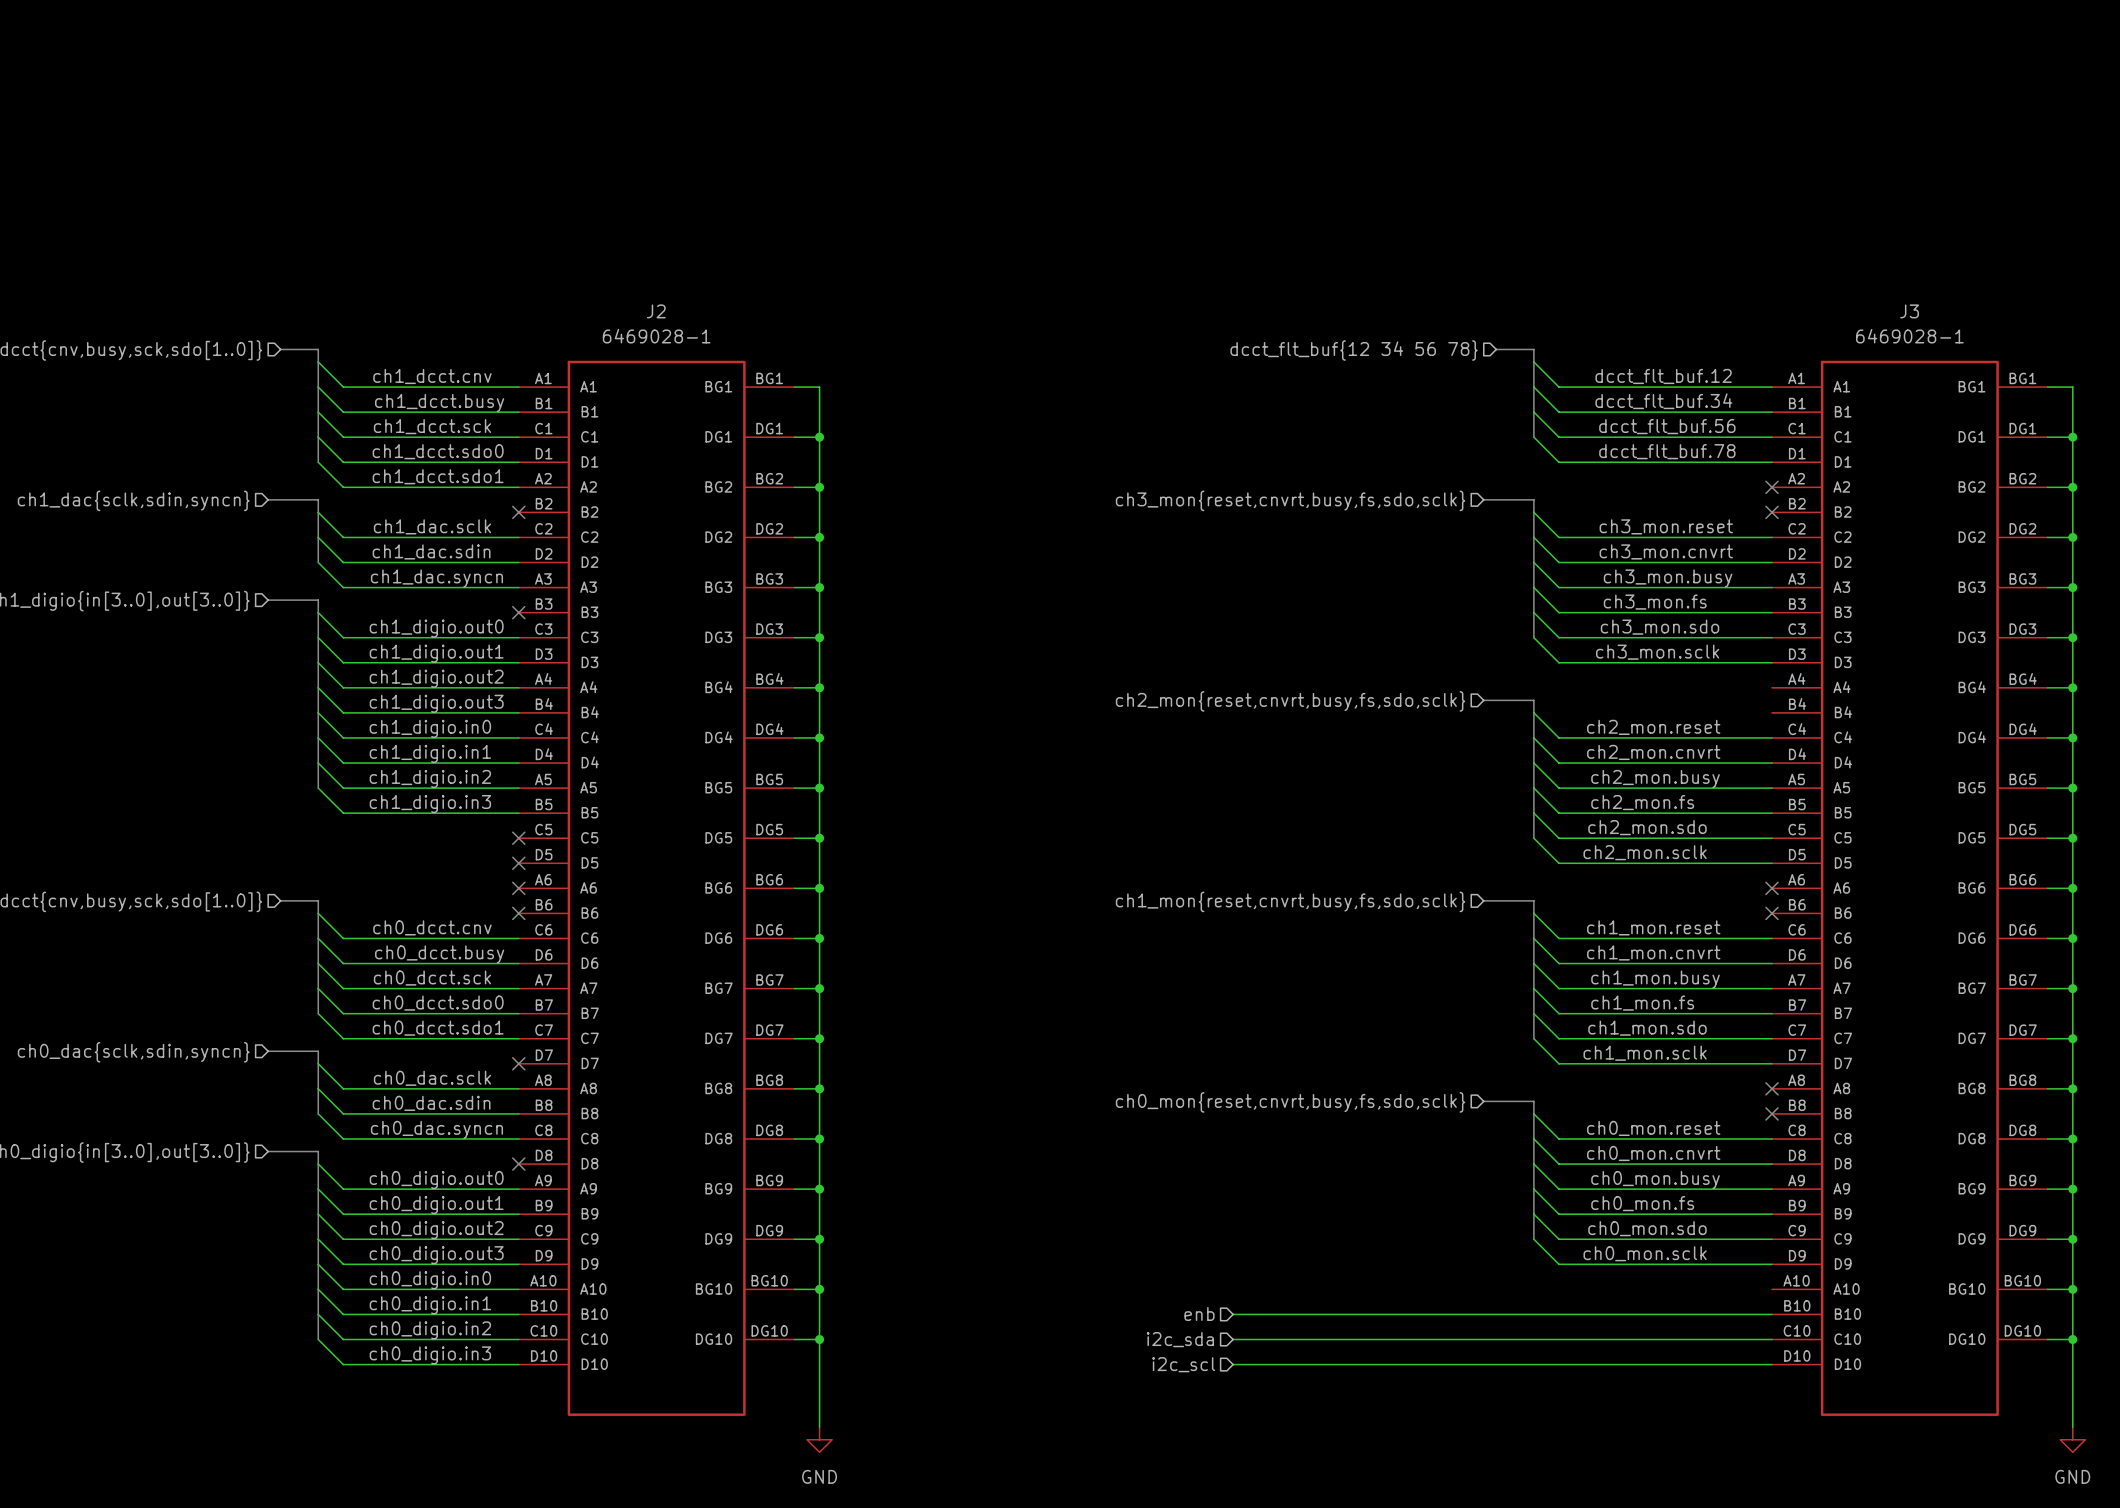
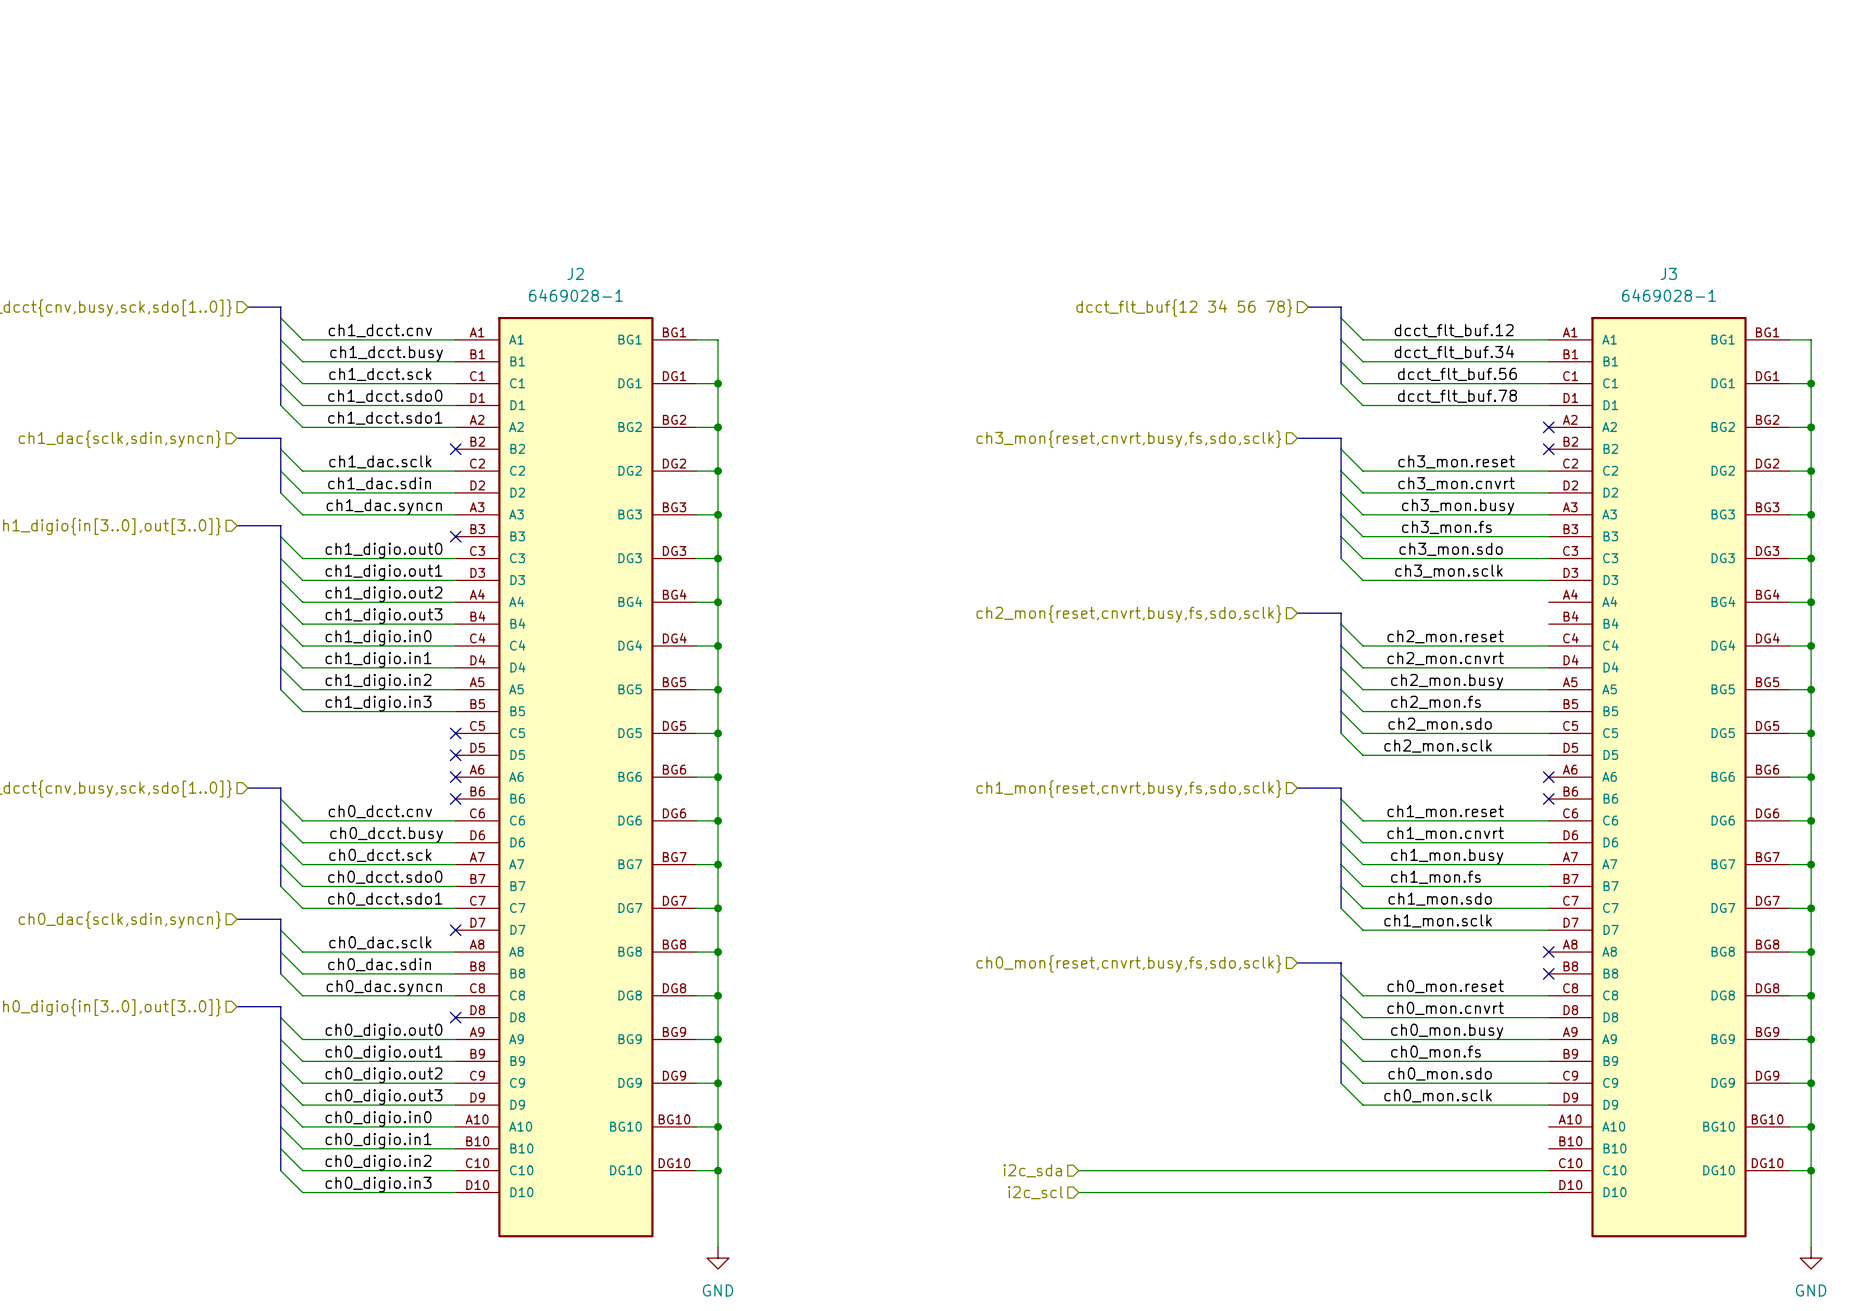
hierarchical label: enb (1199, 1313) -> none
wire: (1233, 1314) (1772, 1314) -> none

